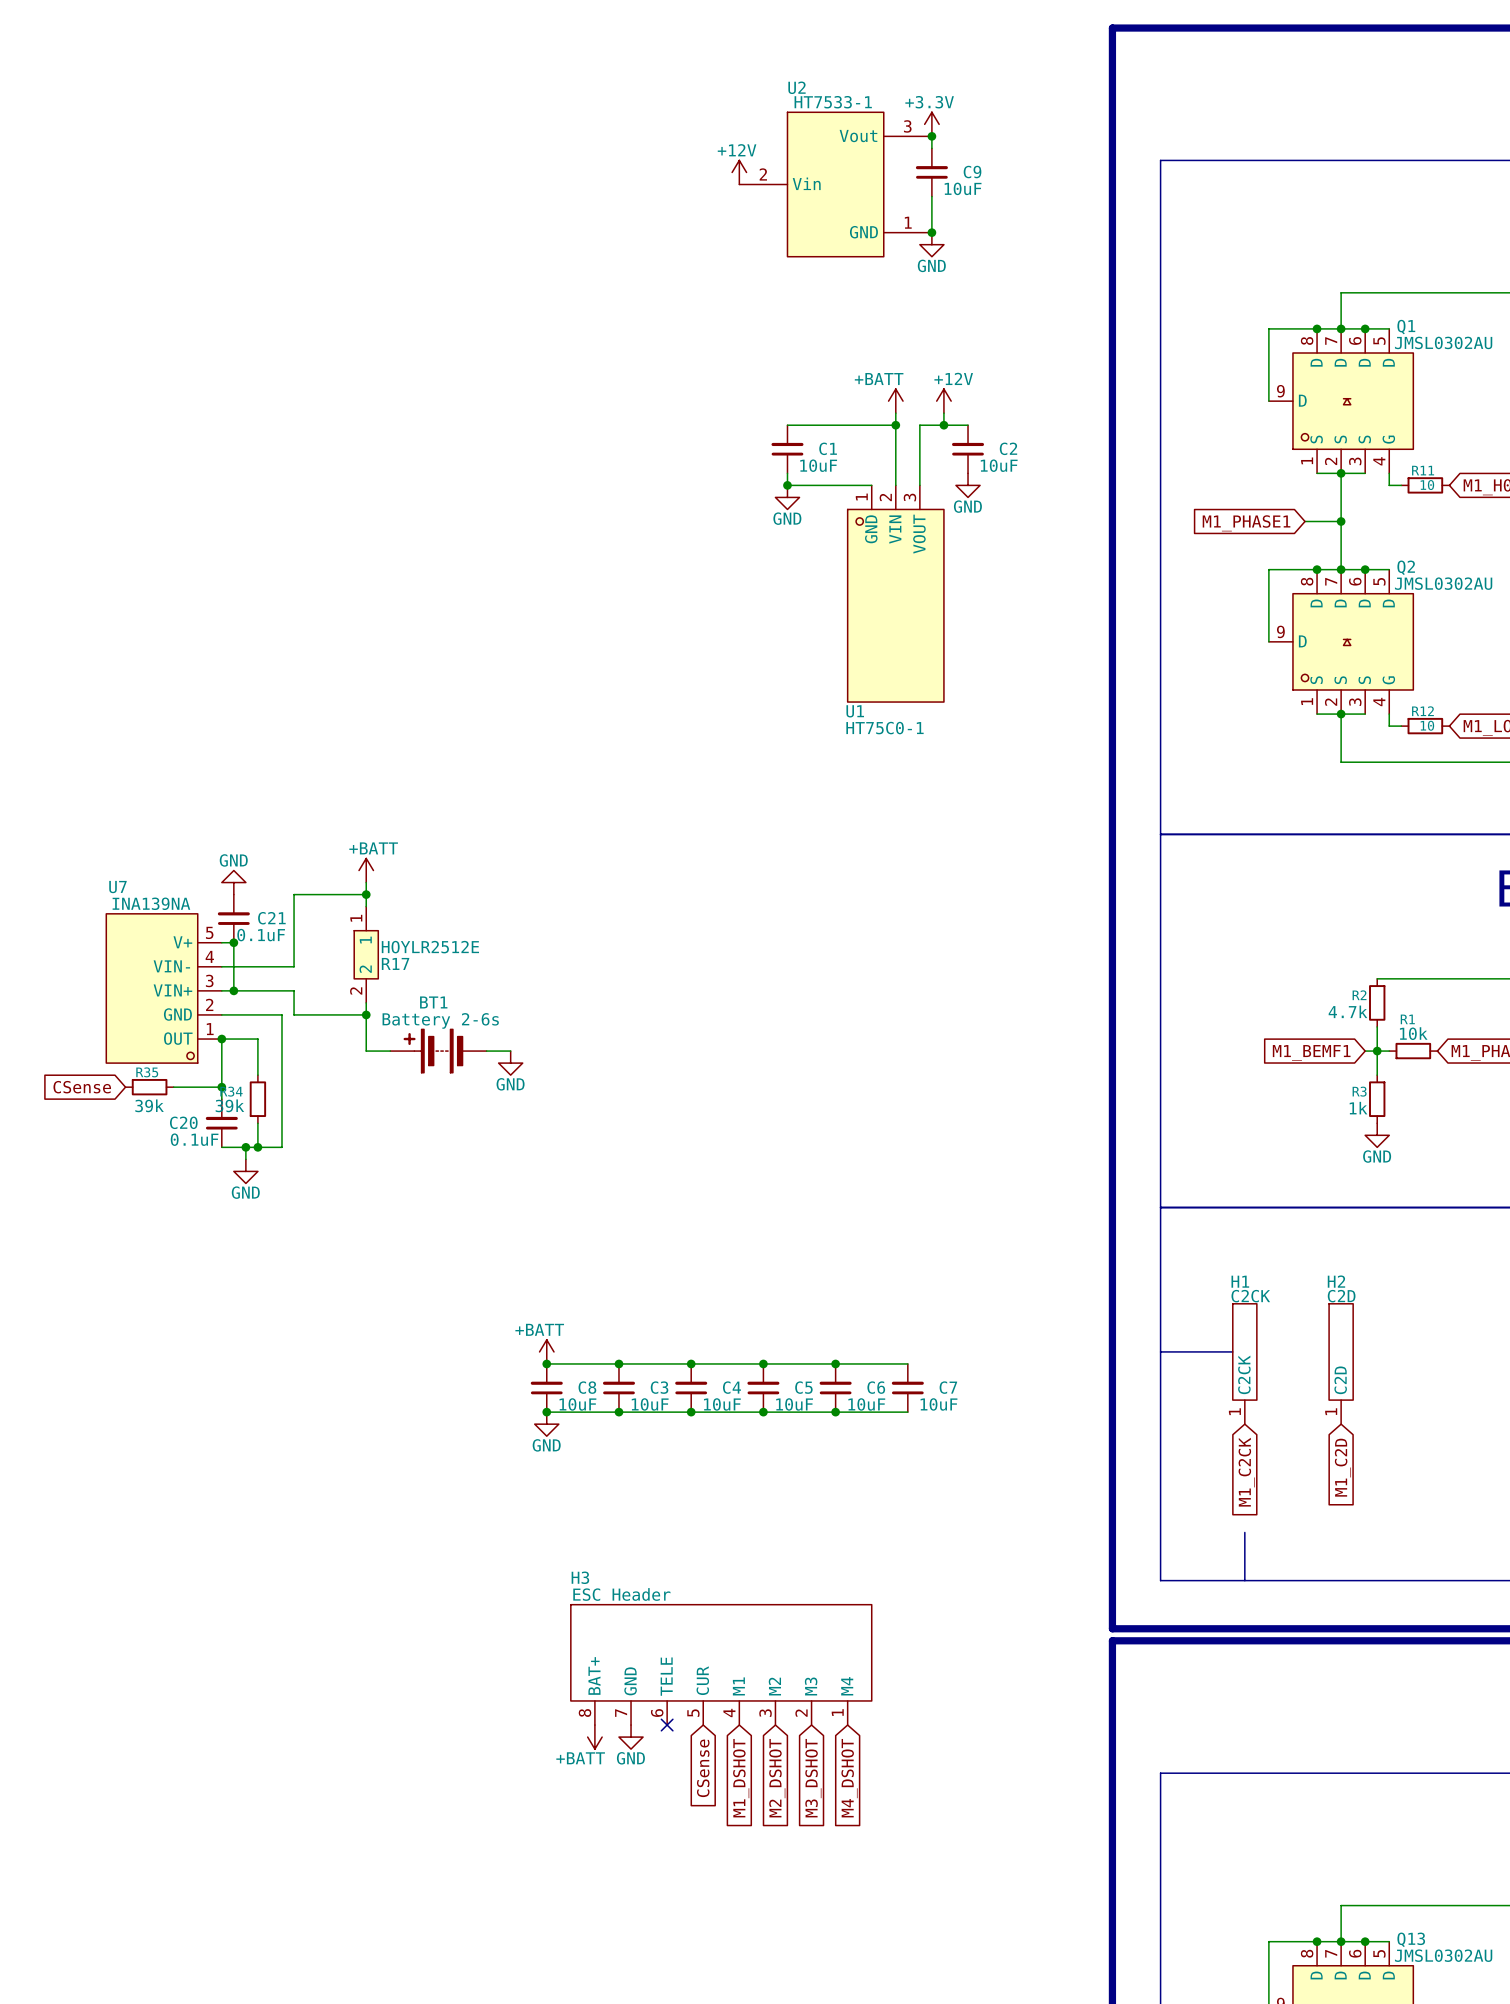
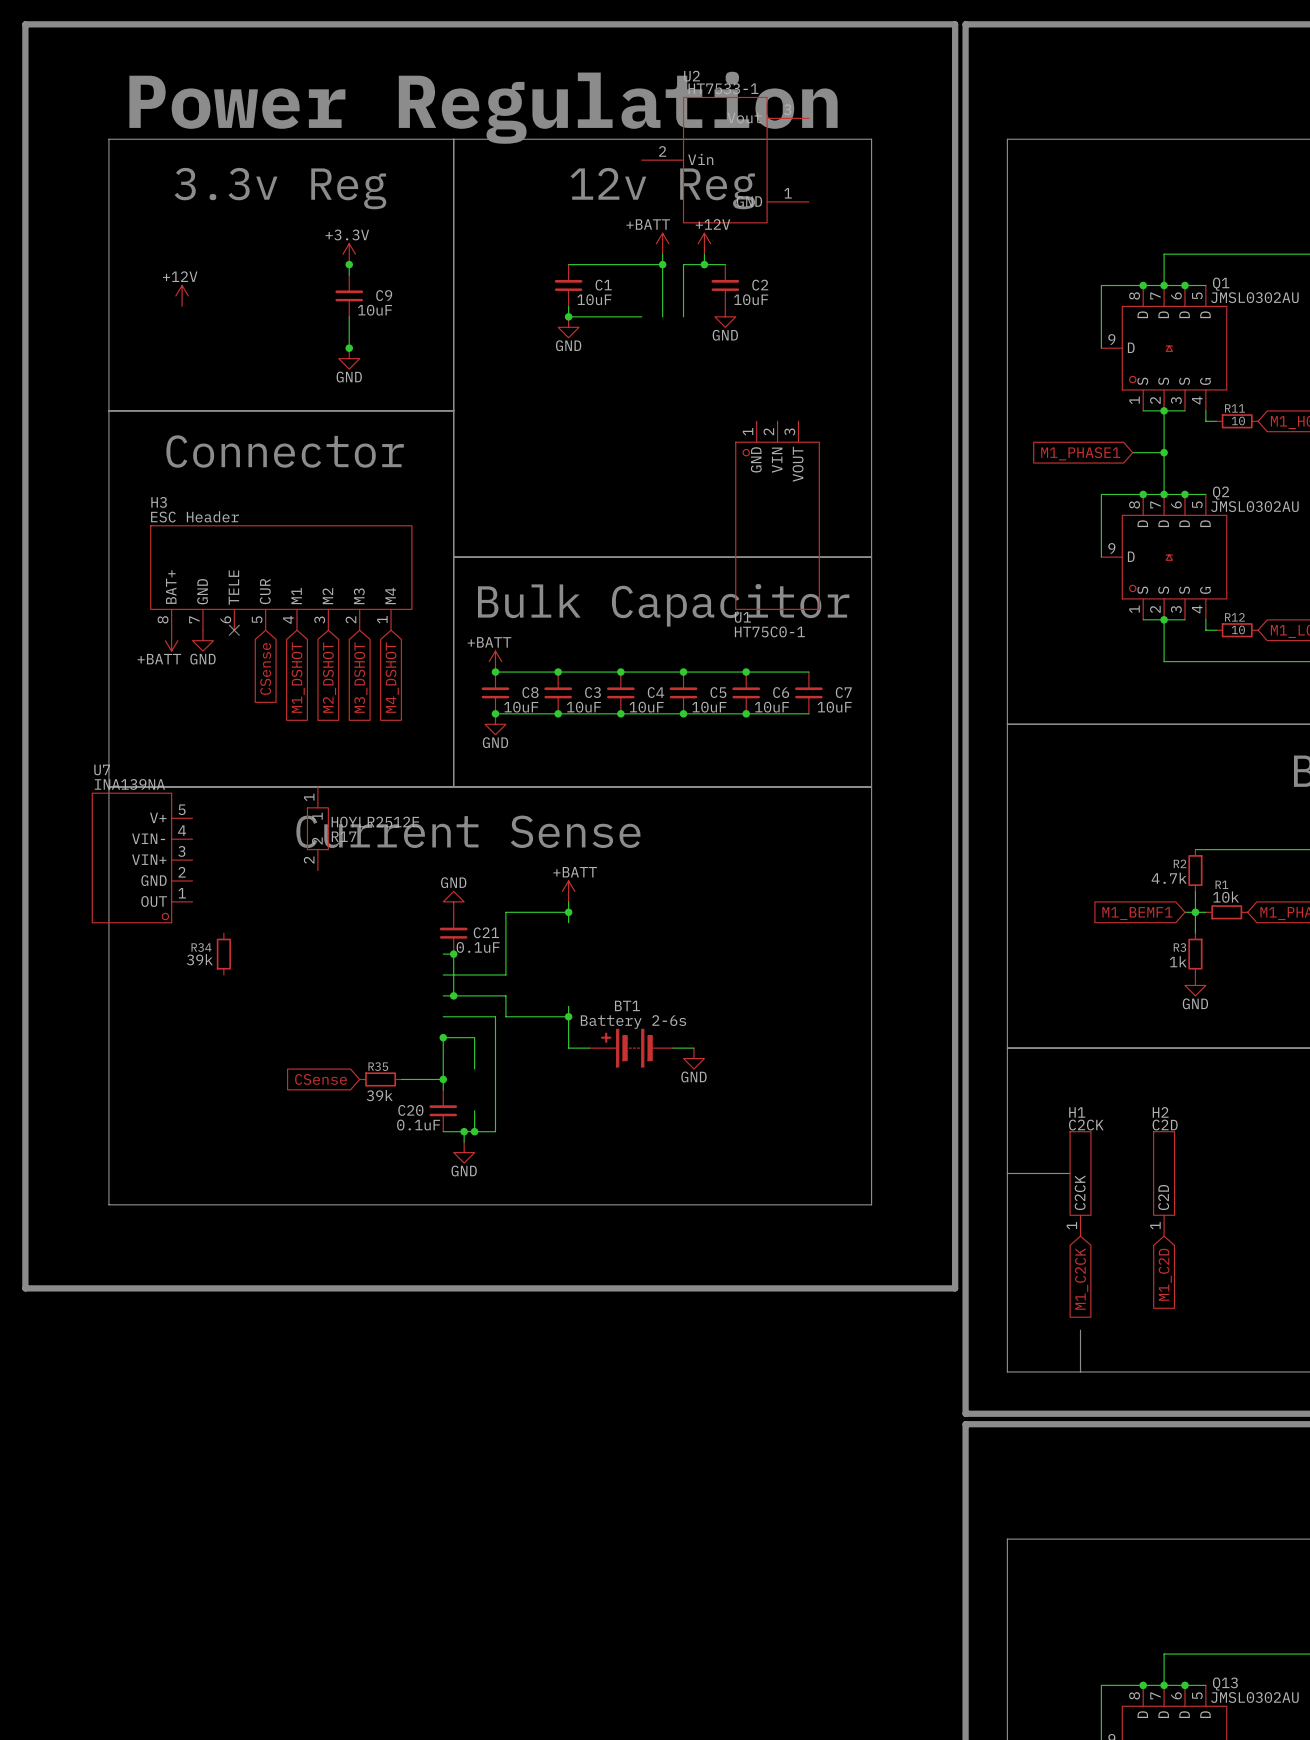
line: none -> (25, 24) (955, 24) (955, 1288) (25, 1288) (25, 24)
text: none -> Power Regulation (483, 107)
power symbol: +3.3V (931, 124) -> none
wire: (931, 136) (931, 148) -> none
junction: (931, 136) -> none
line: none -> (108, 139) (108, 1204) (871, 1204) (871, 139) (108, 139)
line: none -> (453, 139) (453, 786)
power symbol: +12V (739, 172) -> none
C9 position: (931, 172) -> (349, 295)
wire: (931, 196) (931, 232) -> none
text: none -> 3.3v Reg (280, 188)
text: none -> 12v Reg (662, 188)
junction: (931, 232) -> none
power symbol: GND (931, 244) -> none
power symbol: none -> +12V (704, 243)
power symbol: none -> +3.3V (349, 254)
wire: none -> (349, 264) (349, 275)
junction: none -> (349, 264)
junction: none -> (662, 264)
junction: none -> (704, 264)
power symbol: none -> +12V (182, 295)
wire: none -> (349, 316) (349, 348)
junction: none -> (568, 316)
power symbol: none -> GND (725, 316)
power symbol: none -> GND (568, 327)
junction: none -> (349, 348)
power symbol position: +BATT (895, 401) -> +BATT (662, 243)
power symbol: +12V (943, 401) -> none
power symbol: none -> GND (349, 358)
wire: (895, 413) (895, 485) -> (662, 254) (662, 316)
wire: (943, 413) (943, 425) -> (704, 254) (704, 264)
wire: (787, 425) (895, 425) -> (568, 264) (662, 264)
junction: (895, 425) -> none
junction: (943, 425) -> none
wire: (968, 425) (919, 425) (919, 485) -> (725, 264) (683, 264) (683, 316)
C1 position: (787, 449) -> (568, 285)
C2 position: (968, 449) -> (725, 285)
line: none -> (108, 410) (453, 410)
wire: (787, 473) (787, 485) (871, 485) -> (568, 306) (568, 316) (641, 316)
junction: (787, 485) -> none
power symbol: GND (968, 485) -> none
power symbol: GND (787, 497) -> none
text: none -> Connector (285, 451)
line: none -> (453, 557) (871, 557)
text: none -> Bulk Capacitor (663, 605)
no-connect mark: none -> (234, 630)
power symbol: none -> +BATT (171, 640)
power symbol: none -> +BATT (495, 661)
global label: none -> CSense (265, 668)
wire: none -> (495, 672) (808, 672)
junction: none -> (495, 672)
junction: none -> (558, 672)
junction: none -> (620, 672)
junction: none -> (683, 672)
junction: none -> (746, 672)
global label: none -> M1_DSHOT (298, 677)
global label: none -> M2_DSHOT (329, 677)
global label: none -> M3_DSHOT (360, 677)
global label: none -> M4_DSHOT (392, 677)
wire: none -> (495, 713) (808, 713)
junction: none -> (495, 713)
junction: none -> (558, 713)
junction: none -> (620, 713)
junction: none -> (683, 713)
junction: none -> (746, 713)
power symbol: none -> GND (495, 724)
power symbol: +BATT (366, 870) -> none
power symbol rotation: 0° (233, 882) -> 180° (202, 640)
power symbol position: GND (233, 882) -> GND (202, 640)
wire: (366, 882) (366, 906) -> none
wire: (366, 894) (294, 894) (294, 966) (221, 966) -> none
junction: (366, 894) -> none
line: none -> (108, 786) (871, 786)
C21 position: (233, 918) -> (453, 933)
wire: (221, 942) (233, 942) (233, 990) -> none
junction: (233, 942) -> none
text: none -> Current Sense (468, 831)
wire: (221, 990) (294, 990) (294, 1014) (366, 1014) -> none
junction: (233, 990) -> none
wire: (366, 1002) (366, 1051) (390, 1051) -> none
wire: (221, 1014) (281, 1014) (281, 1147) (221, 1147) -> none
junction: (366, 1014) -> none
power symbol: none -> +BATT (568, 891)
junction: (221, 1039) -> none
wire: none -> (568, 901) (568, 922)
BT1 position: (438, 1051) -> (631, 1048)
wire: (486, 1051) (510, 1051) -> none
wire: none -> (568, 912) (505, 912) (505, 974) (443, 974)
junction: none -> (568, 912)
power symbol rotation: 0° (510, 1063) -> 180° (453, 901)
power symbol position: GND (510, 1063) -> GND (453, 901)
wire: (257, 1075) (257, 1039) (221, 1039) (221, 1099) -> none
global label: CSense (82, 1087) -> none
R35 position: (149, 1087) -> (380, 1079)
wire: (173, 1087) (221, 1087) -> none
junction: (221, 1087) -> none
wire: none -> (443, 954) (453, 954) (453, 995)
junction: none -> (453, 954)
C20 position: (221, 1123) -> (443, 1110)
wire: (257, 1123) (257, 1147) -> none
wire: (245, 1147) (245, 1159) -> none
junction: (245, 1147) -> none
junction: (257, 1147) -> none
wire: none -> (443, 995) (505, 995) (505, 1016) (568, 1016)
junction: none -> (453, 995)
wire: none -> (568, 1006) (568, 1048) (589, 1048)
power symbol: GND (245, 1171) -> none
wire: none -> (443, 1016) (495, 1016) (495, 1131) (443, 1131)
junction: none -> (568, 1016)
junction: none -> (443, 1037)
wire: none -> (673, 1048) (693, 1048)
power symbol: none -> GND (693, 1058)
wire: none -> (474, 1069) (474, 1037) (443, 1037) (443, 1089)
global label: none -> CSense (321, 1079)
wire: none -> (401, 1079) (443, 1079)
junction: none -> (443, 1079)
wire: none -> (474, 1110) (474, 1131)
wire: none -> (464, 1131) (464, 1142)
junction: none -> (464, 1131)
junction: none -> (474, 1131)
power symbol: +BATT (546, 1351) -> none
wire: (546, 1363) (907, 1363) -> none
junction: (546, 1363) -> none
junction: (618, 1363) -> none
junction: (691, 1363) -> none
junction: (763, 1363) -> none
junction: (835, 1363) -> none
C8 position: (546, 1388) -> (495, 692)
C3 position: (618, 1388) -> (558, 692)
C4 position: (691, 1388) -> (620, 692)
C5 position: (763, 1388) -> (683, 692)
C6 position: (835, 1388) -> (746, 692)
C7 position: (907, 1388) -> (808, 692)
wire: (546, 1412) (907, 1412) -> none
junction: (546, 1412) -> none
junction: (618, 1412) -> none
junction: (691, 1412) -> none
junction: (763, 1412) -> none
junction: (835, 1412) -> none
power symbol position: GND (546, 1424) -> GND (464, 1152)
H3 position: (721, 1664) -> (281, 578)
no-connect mark: (667, 1725) -> none
power symbol: +BATT (594, 1737) -> none
power symbol: GND (631, 1737) -> none
global label: CSense (703, 1768) -> none
global label: M1_DSHOT (741, 1778) -> none
global label: M2_DSHOT (777, 1778) -> none
global label: M3_DSHOT (813, 1778) -> none
global label: M4_DSHOT (849, 1778) -> none

